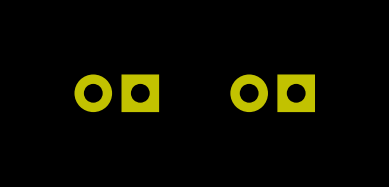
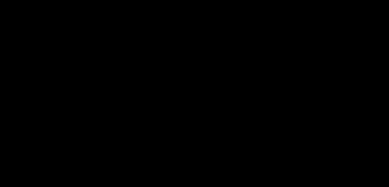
part: (116, 93) -> none
part: (272, 93) -> none

